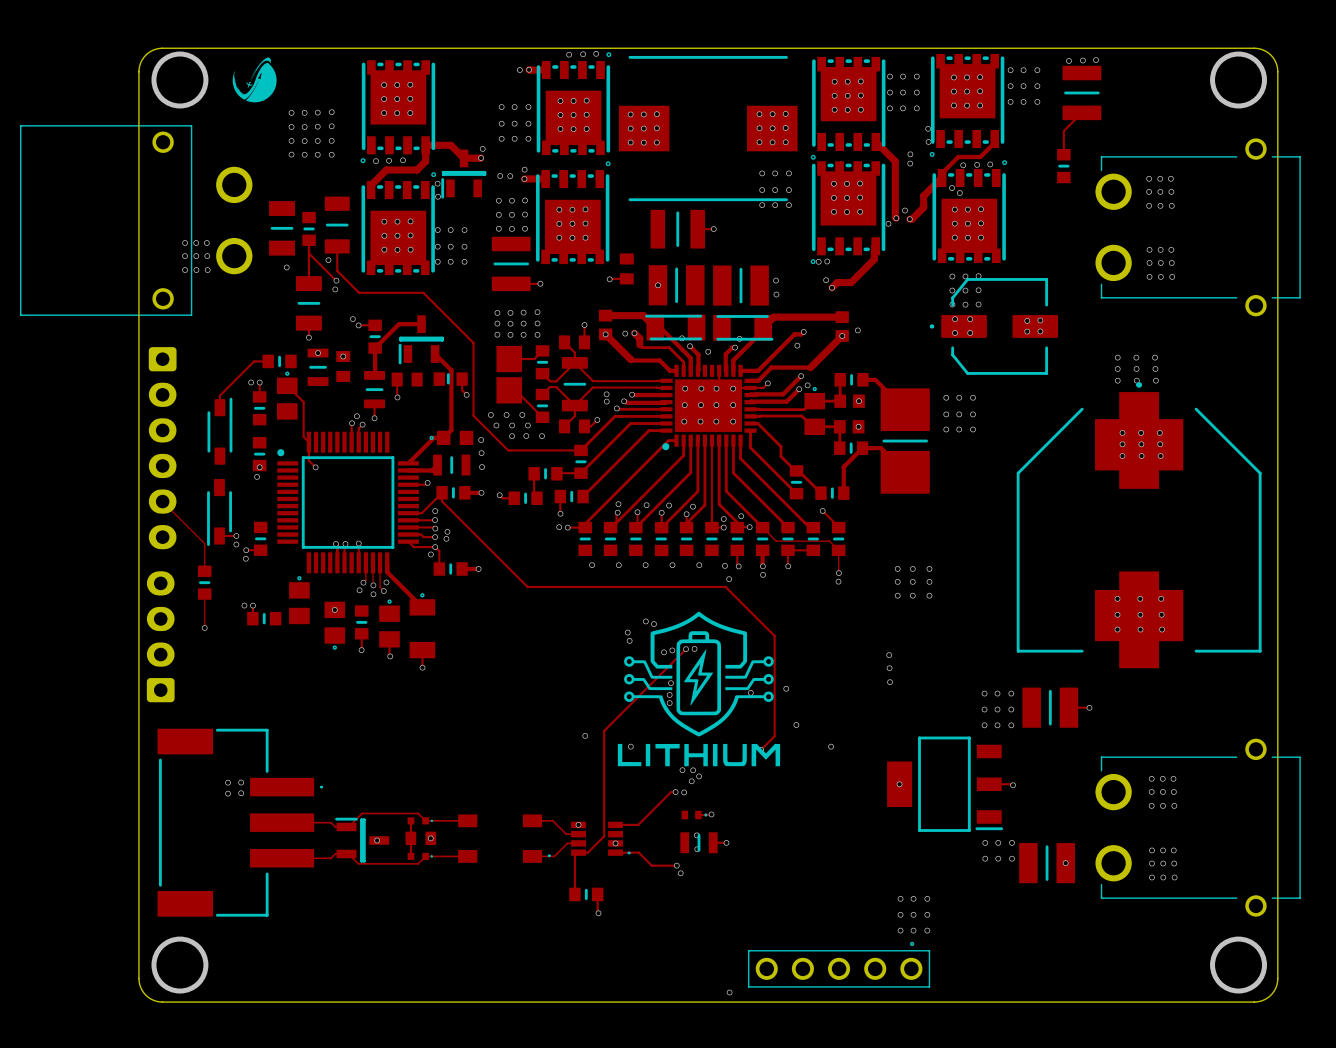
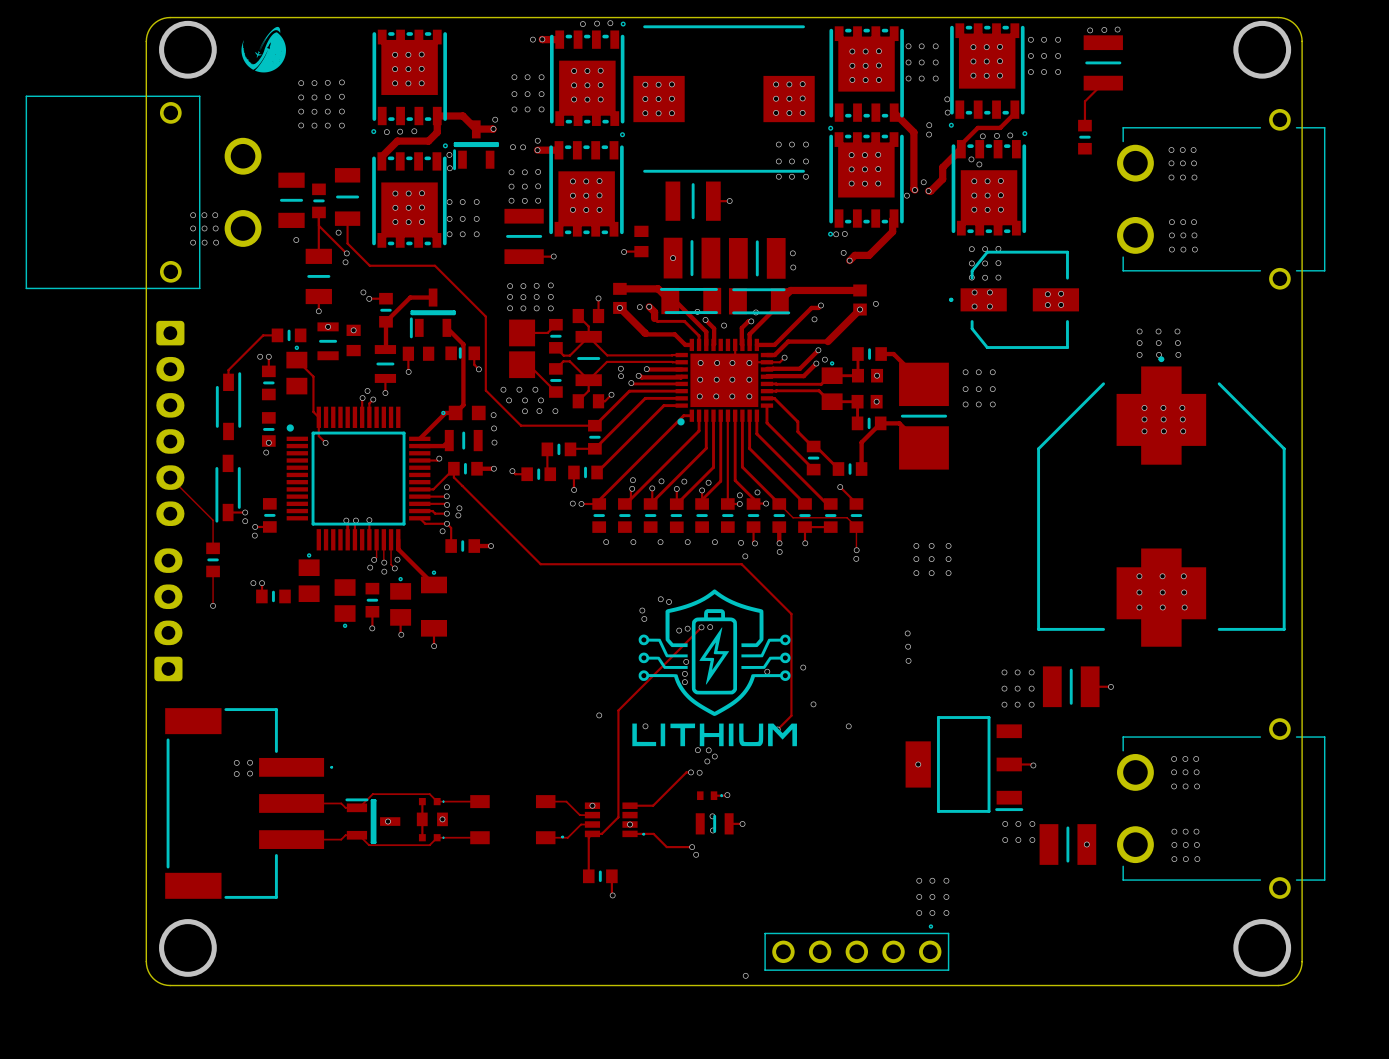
via: (334, 609) -> none

